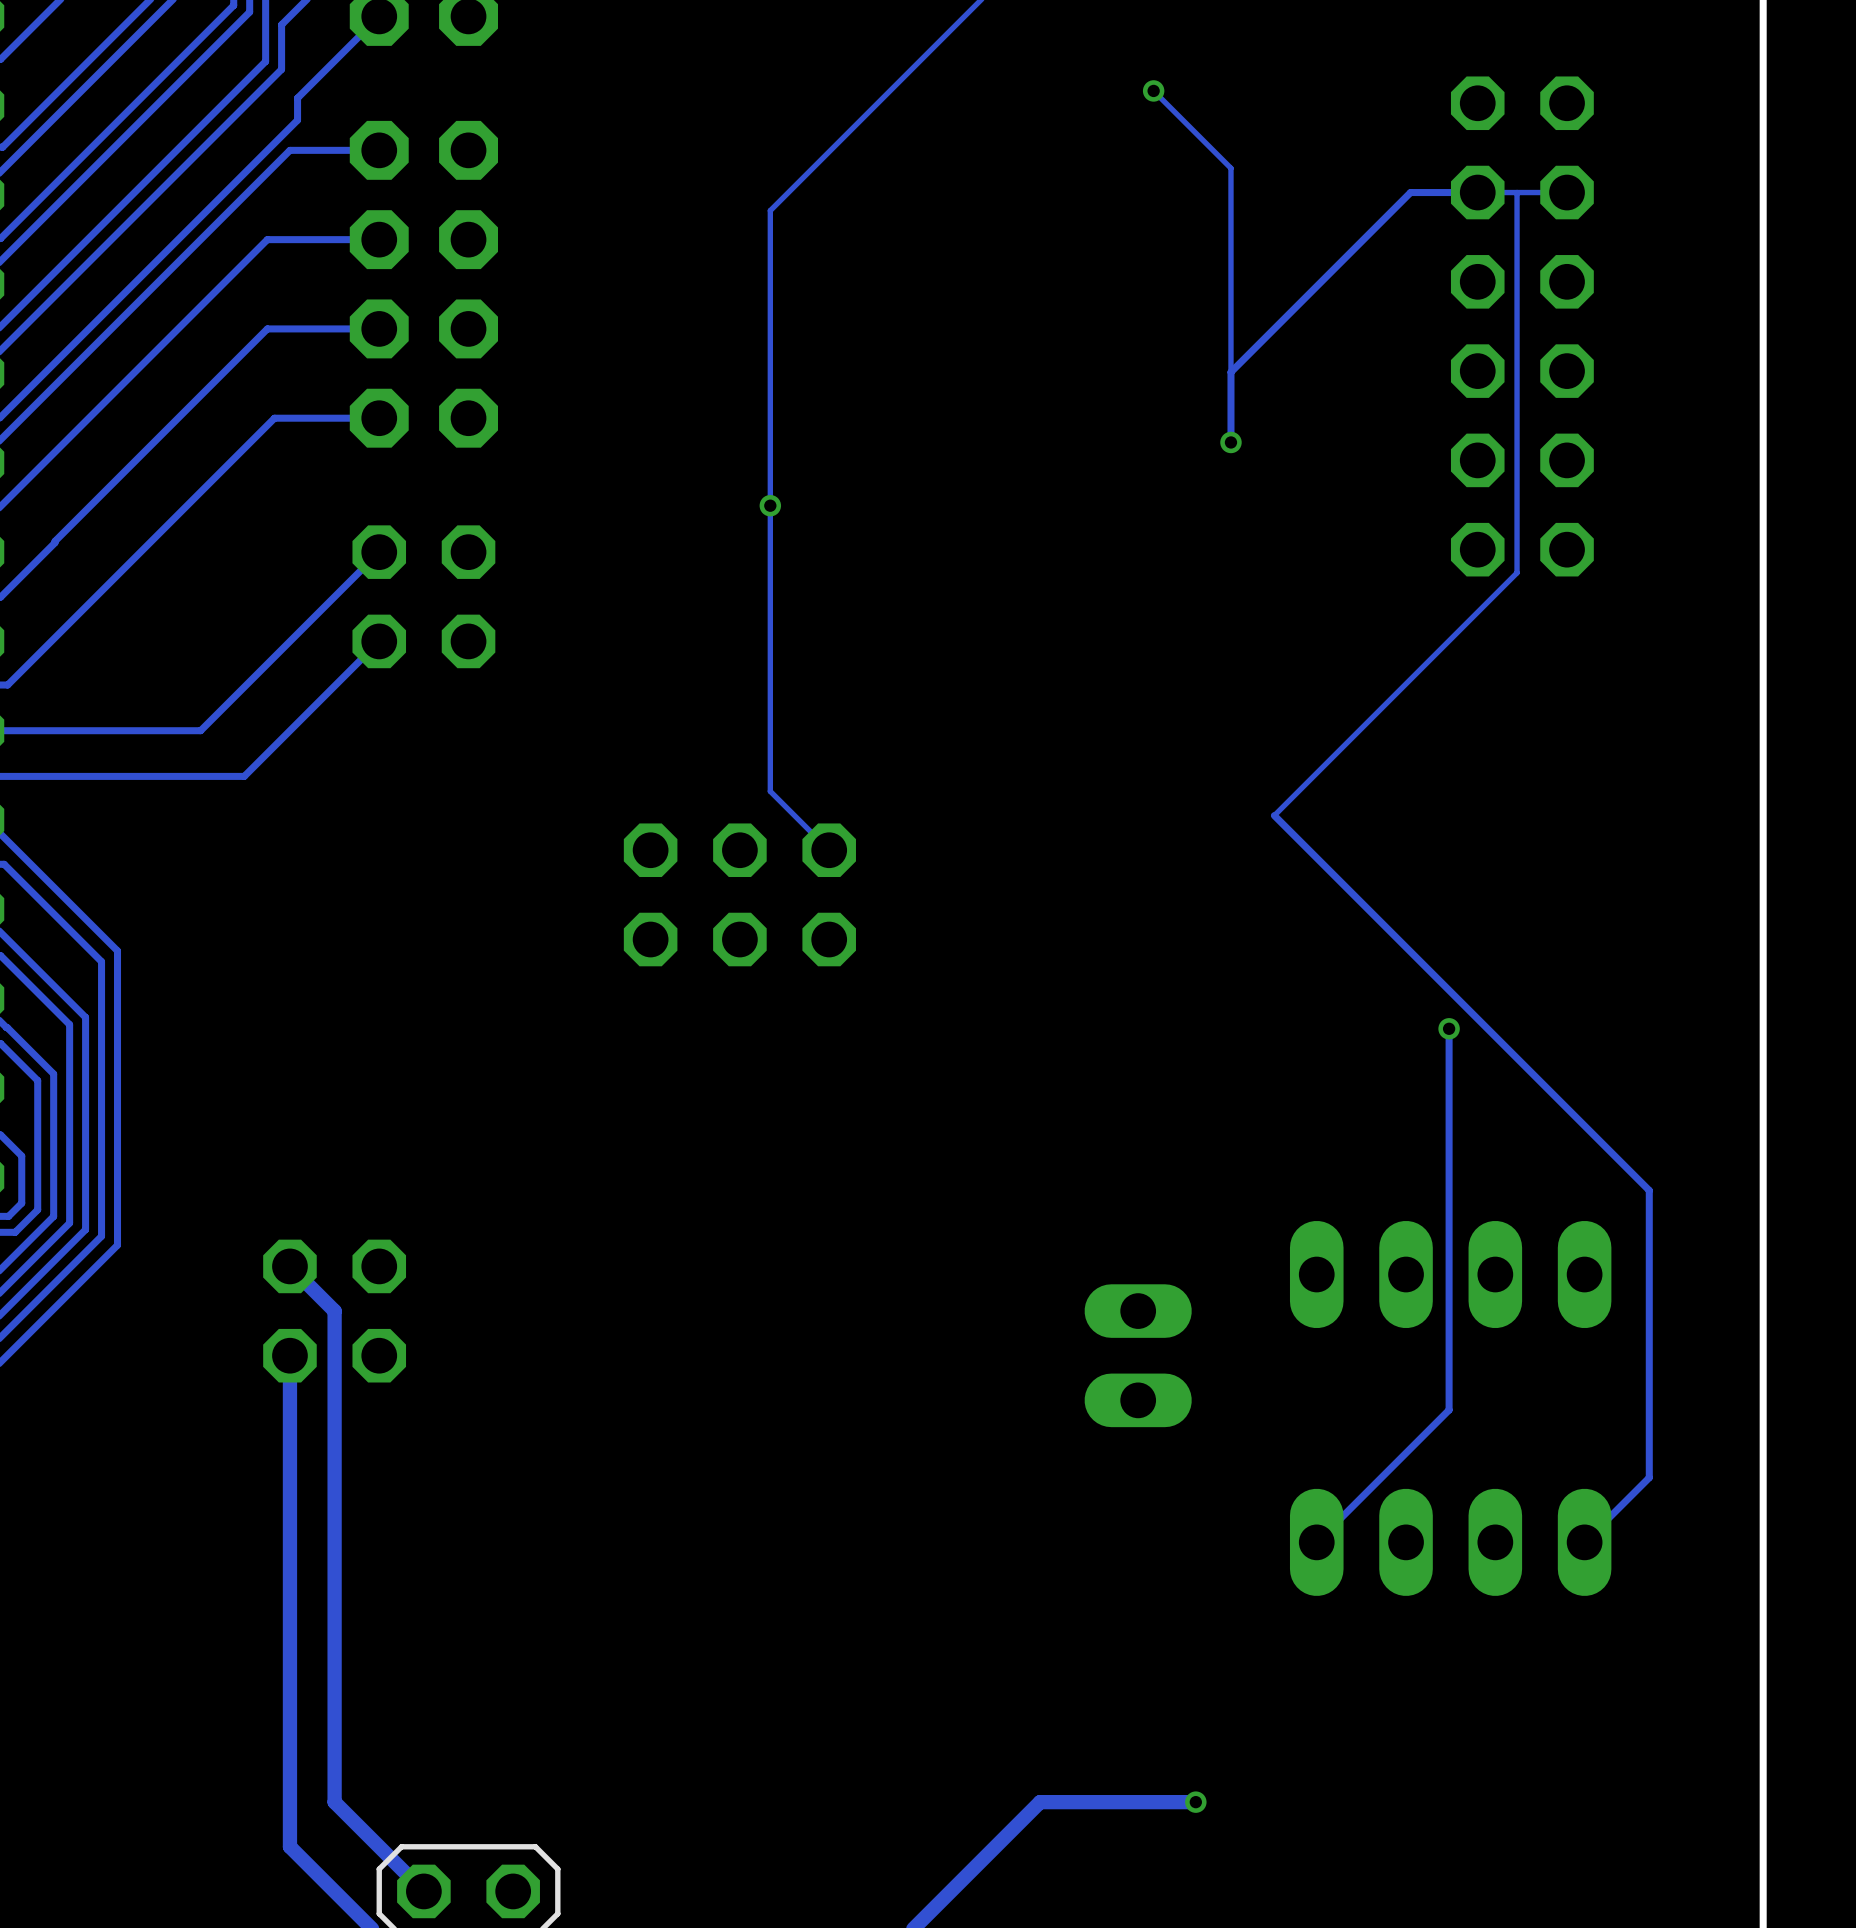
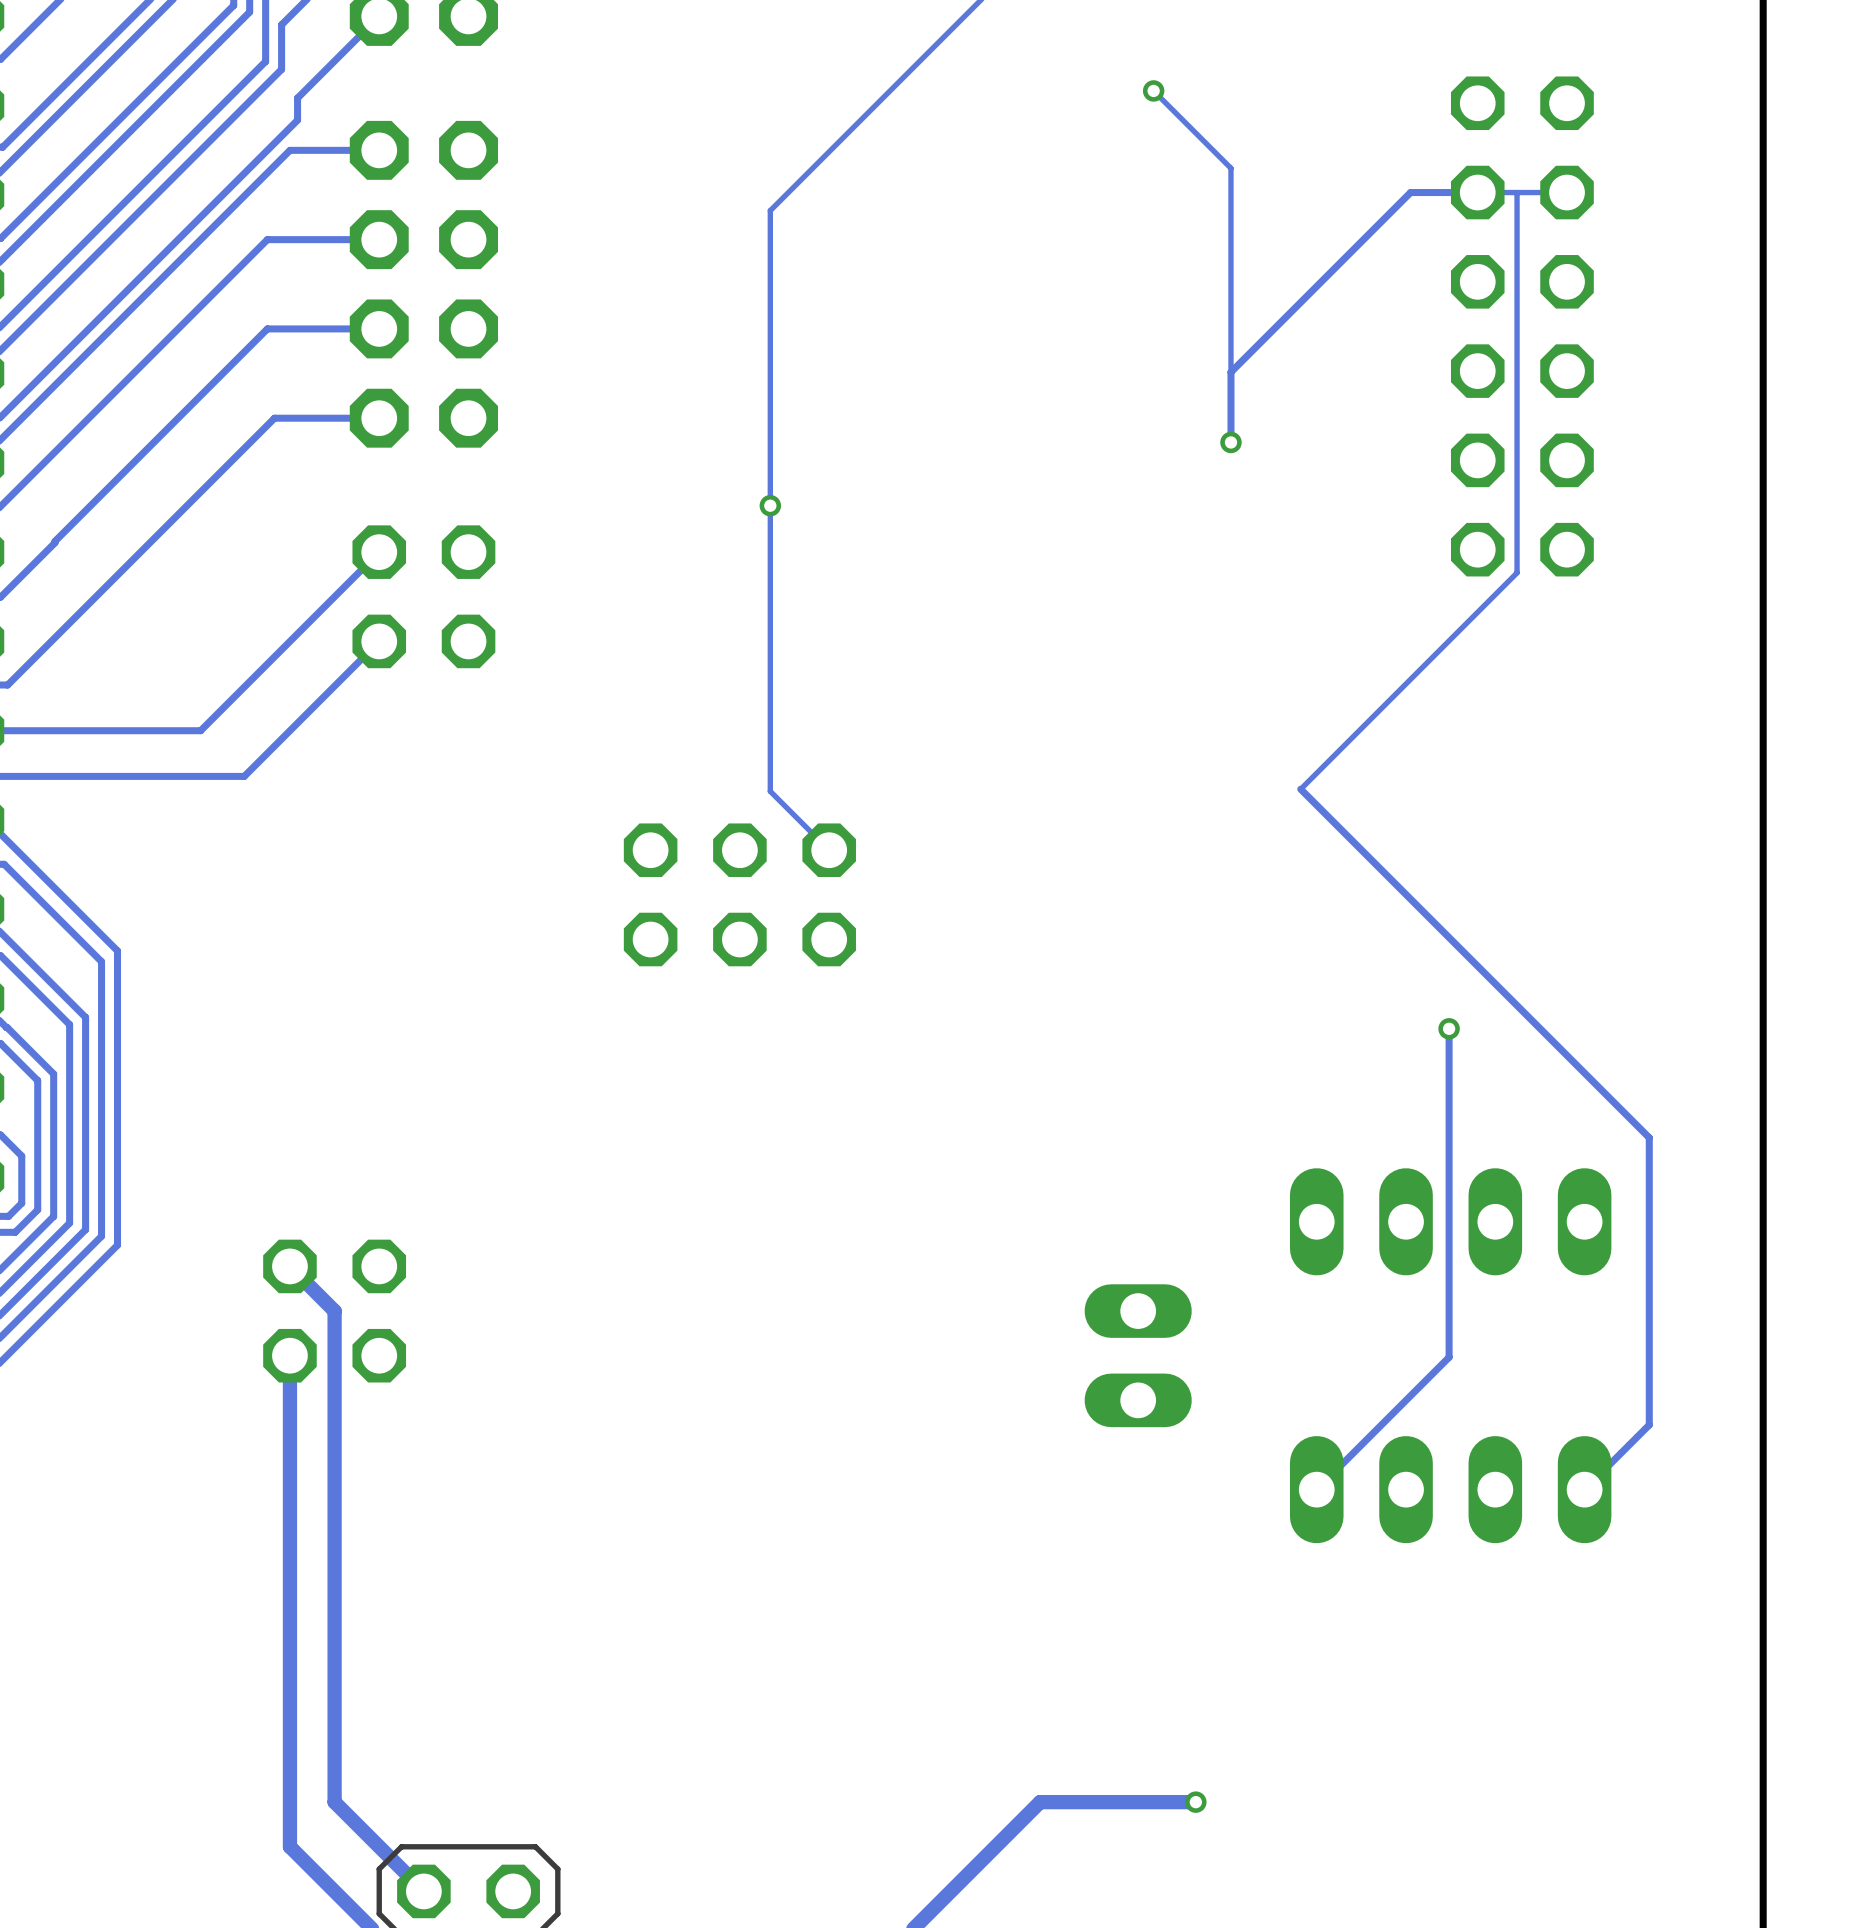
track: (1300, 789) (1274, 815) (1649, 1190) -> (1300, 789) (1649, 1137) (1649, 1190)
part position: (1450, 1274) -> (1450, 1221)
track: (1449, 1357) (1449, 1410) (1316, 1542) -> (1449, 1357) (1316, 1489)
track: (1649, 1424) (1649, 1477) (1584, 1542) -> (1649, 1424) (1584, 1489)
part position: (1450, 1542) -> (1450, 1489)

